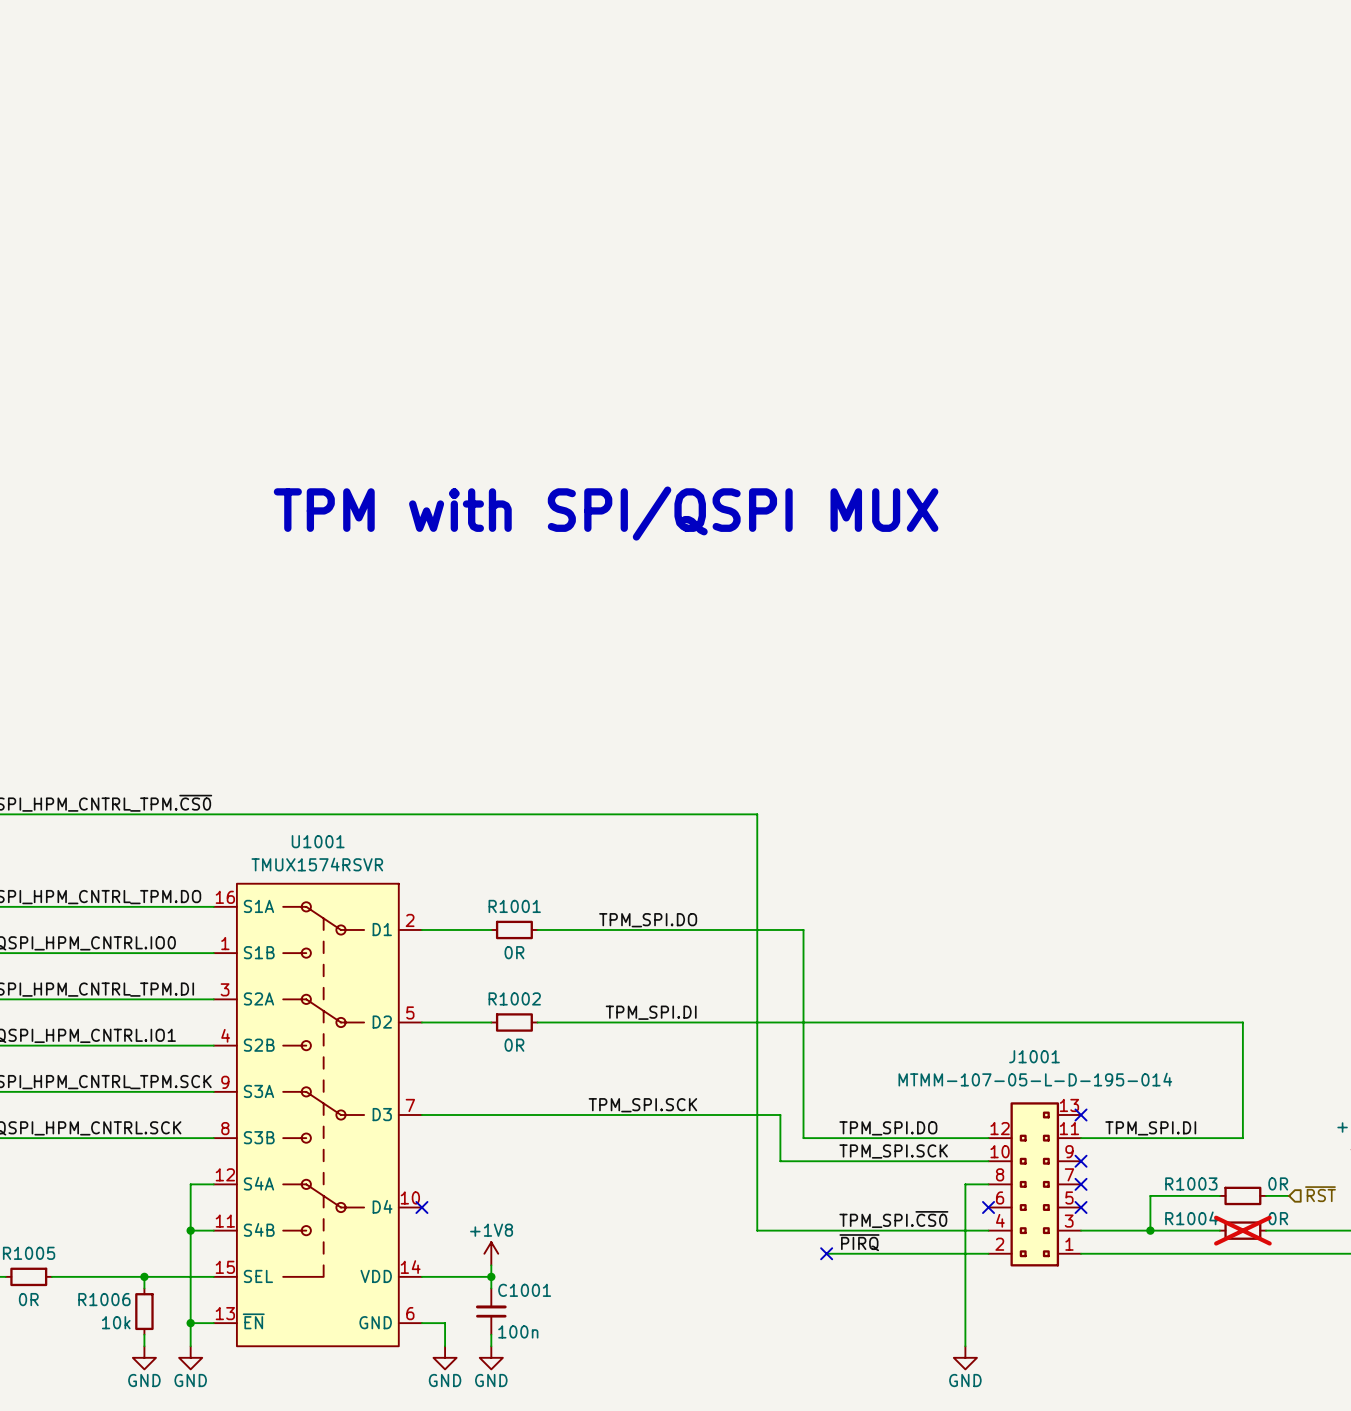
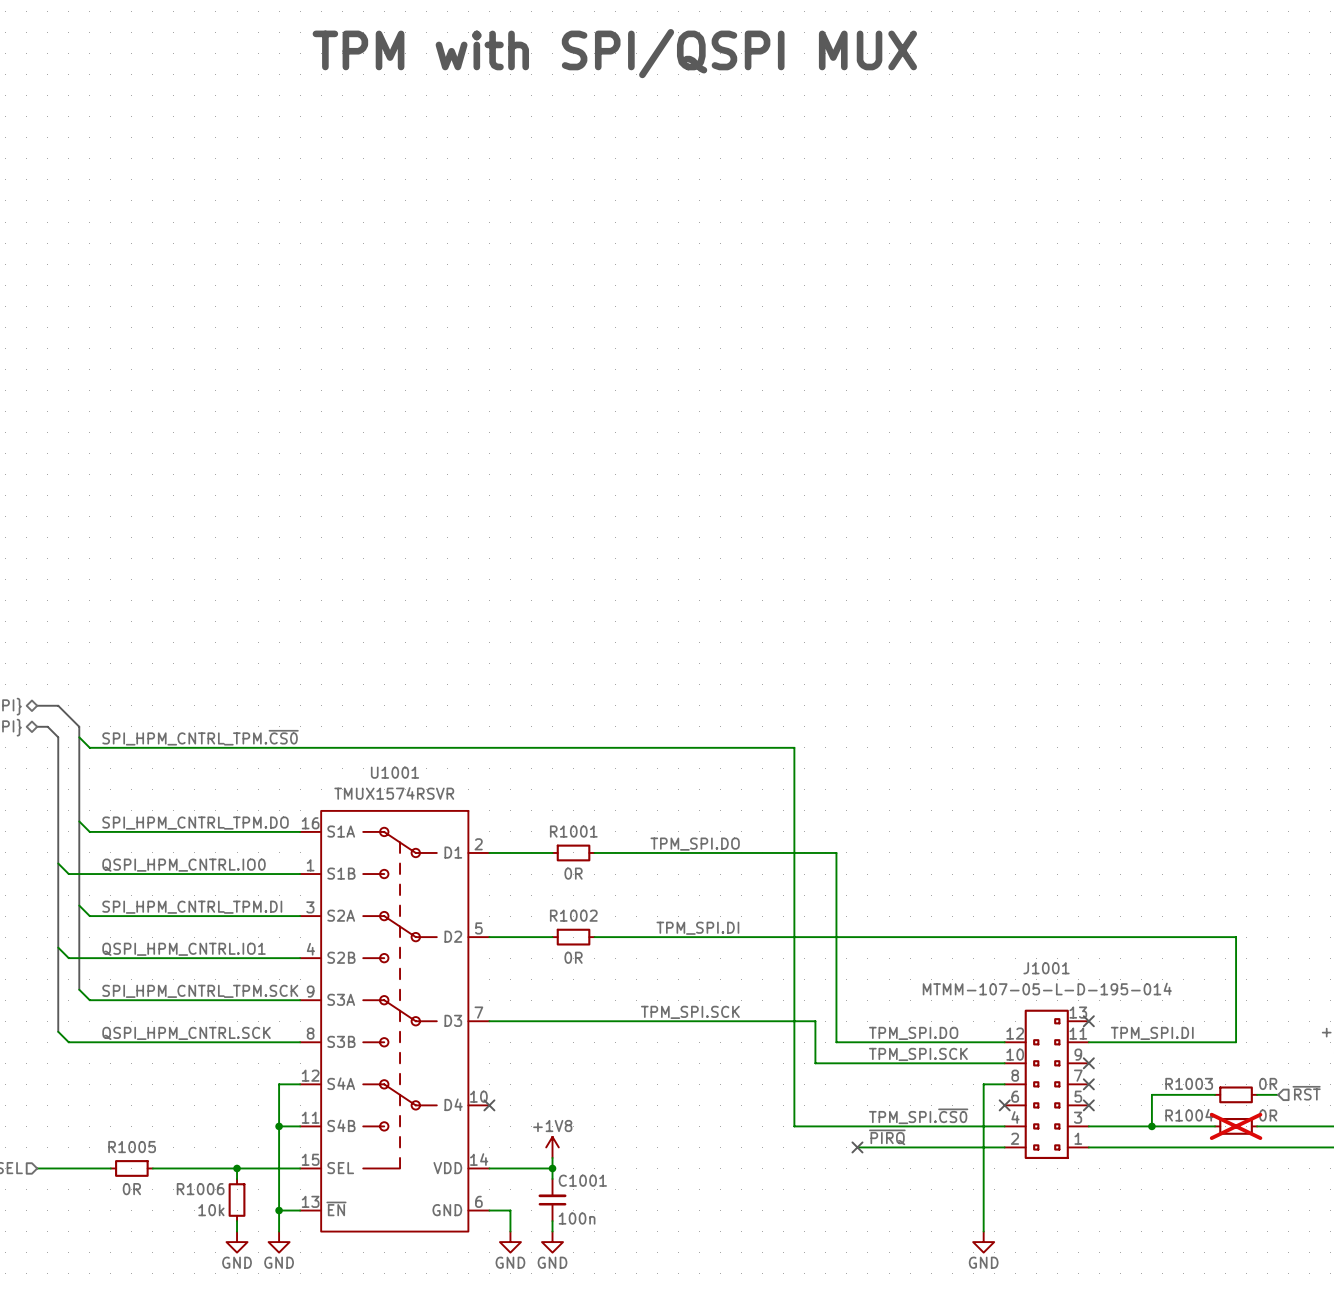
text: none -> TPM with SPI/QSPI MUX (614, 53)
text: TPM with SPI/QSPI MUX (606, 513) -> none

